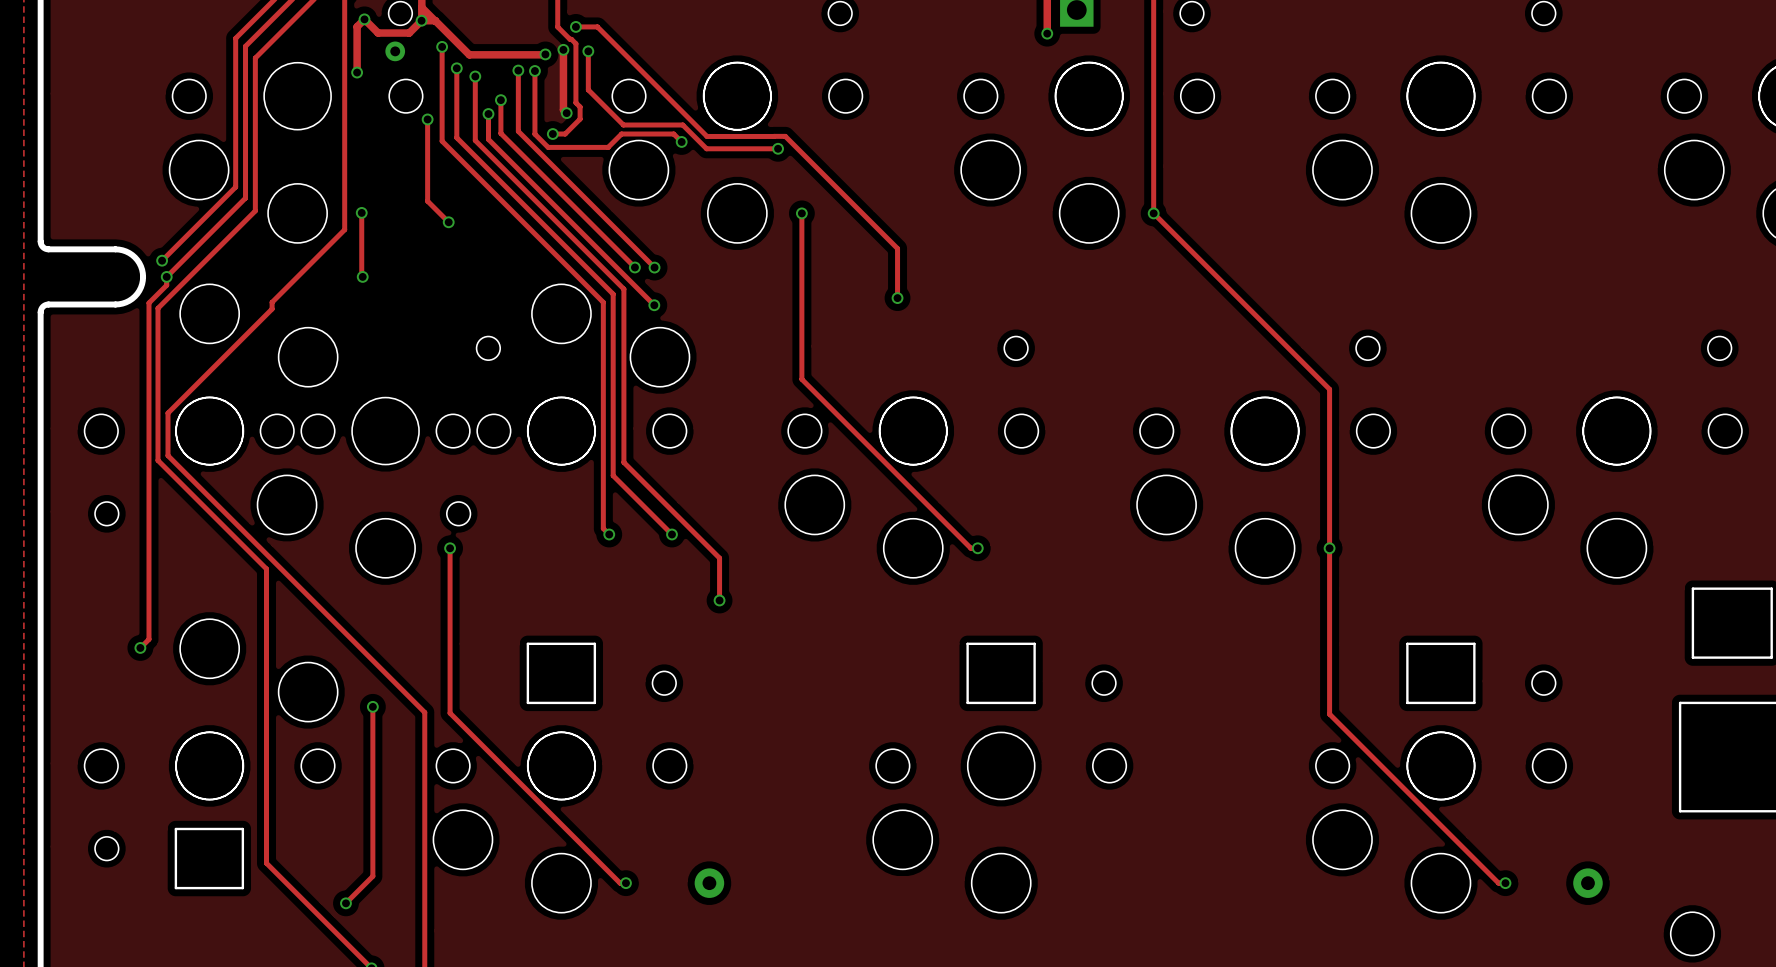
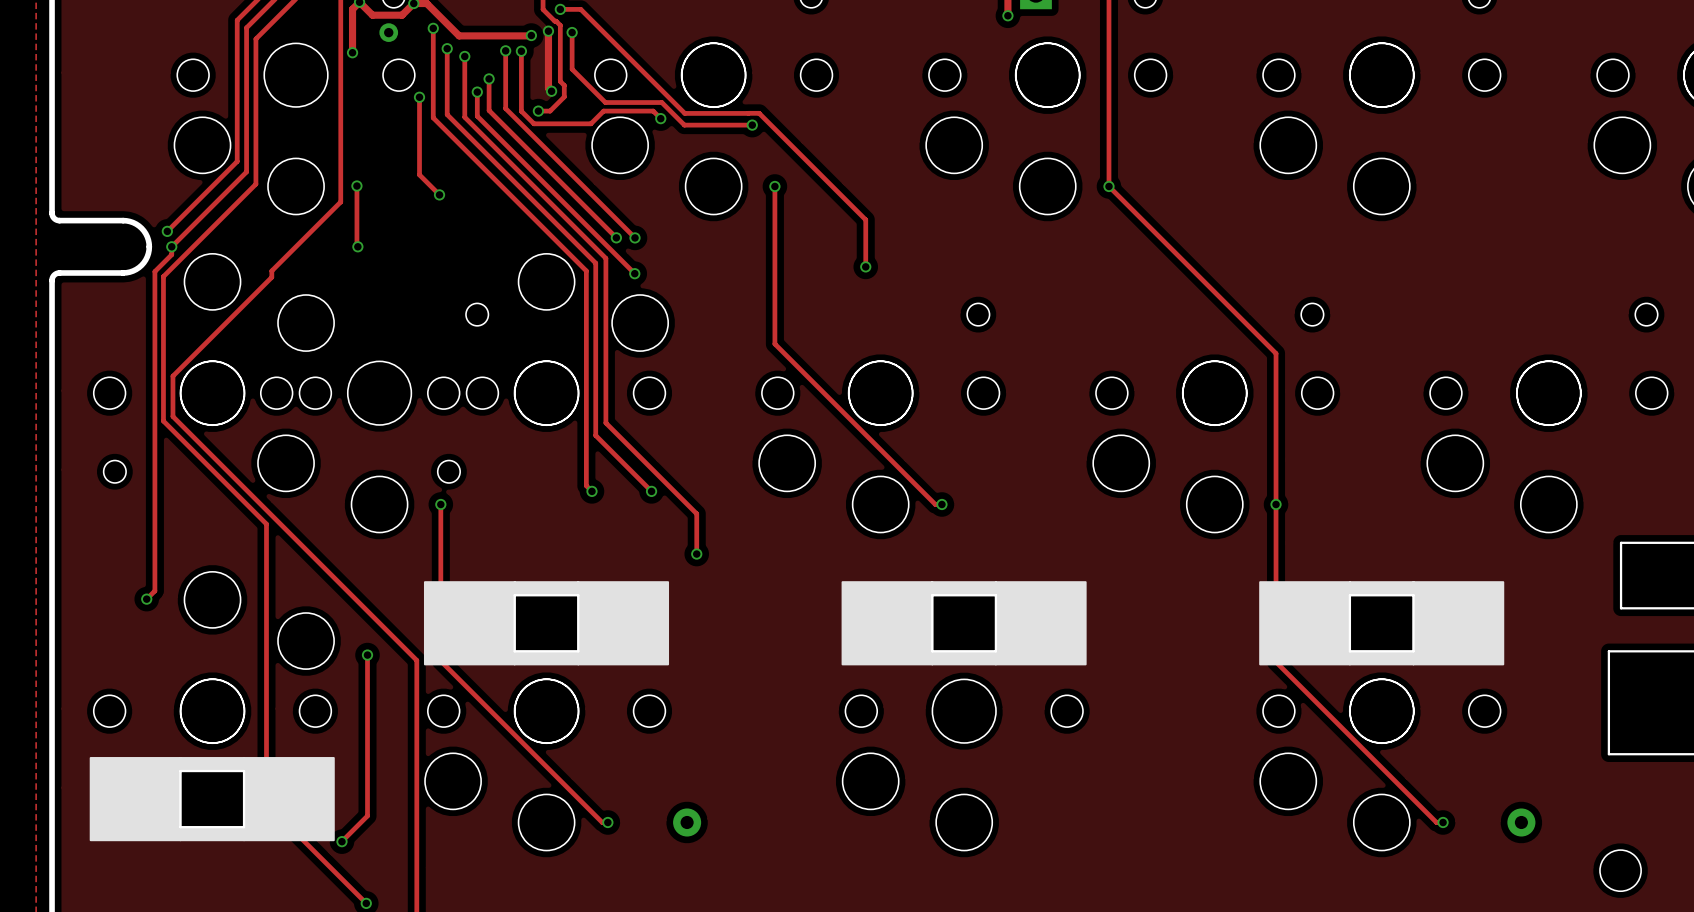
part footprint: [526, 642, 597, 705] -> [423, 581, 670, 666]
part footprint: [966, 642, 1036, 705] -> [841, 581, 1087, 666]
part footprint: [1406, 642, 1476, 705] -> [1259, 581, 1505, 666]
part footprint: [174, 827, 245, 890] -> [89, 757, 335, 842]

